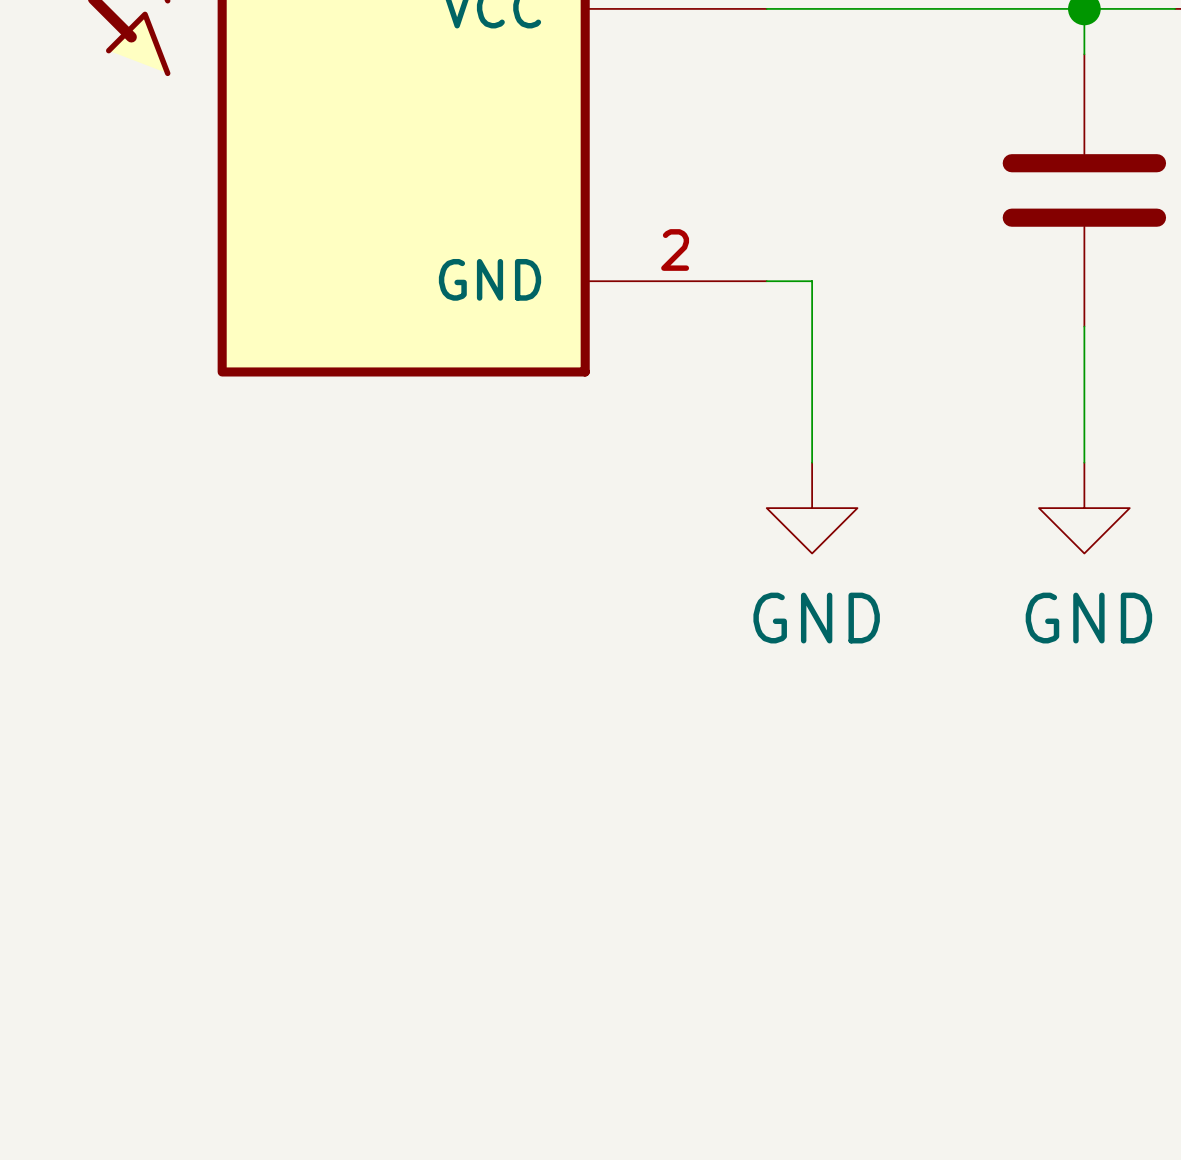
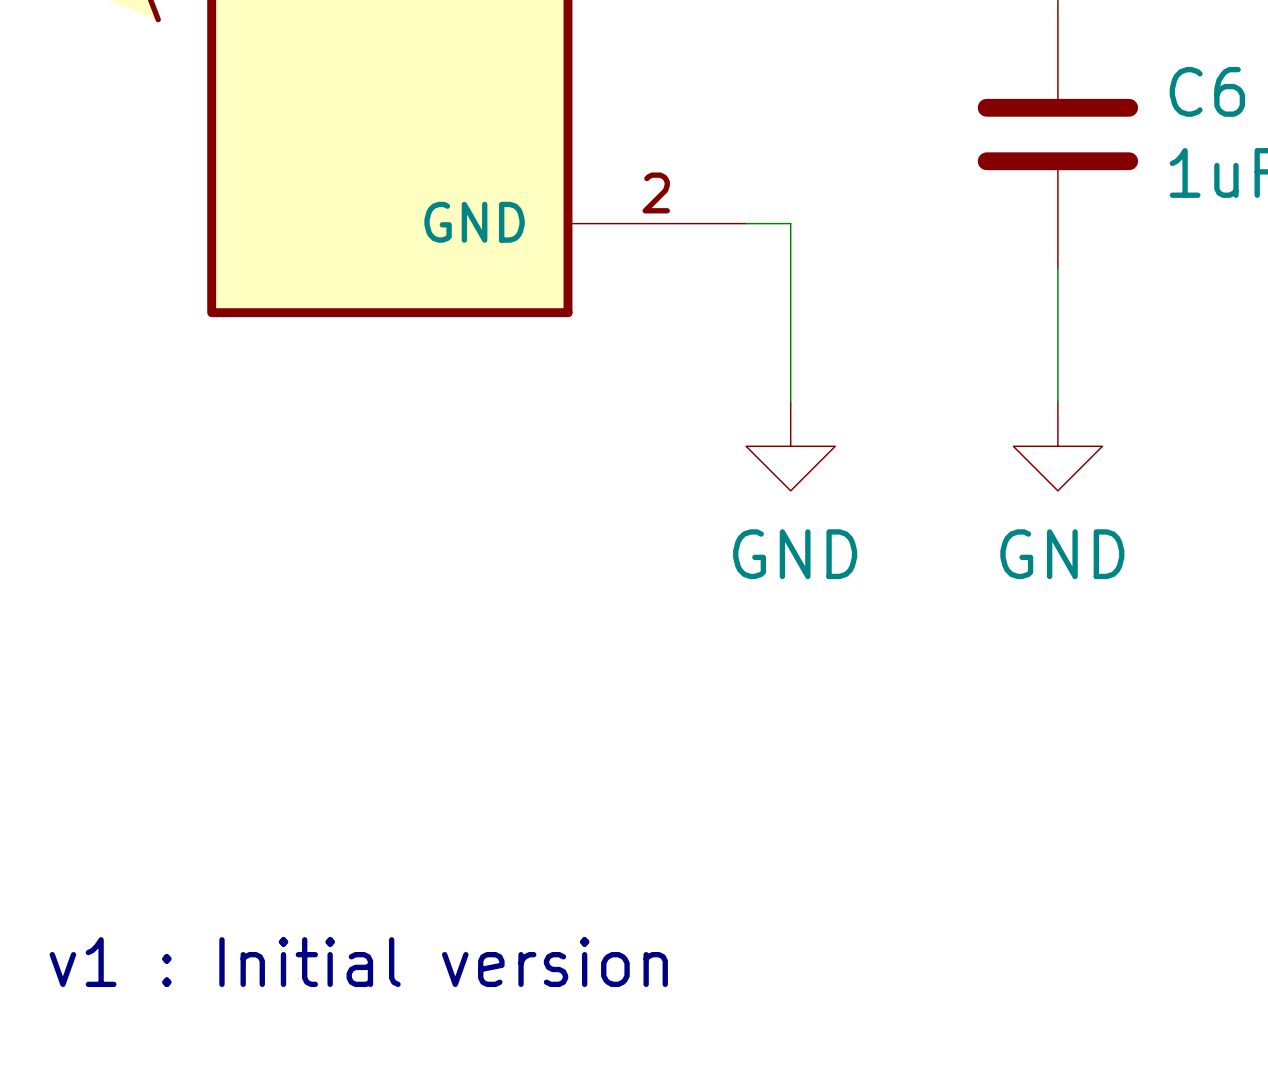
text: none -> v1 : Initial version (358, 962)

